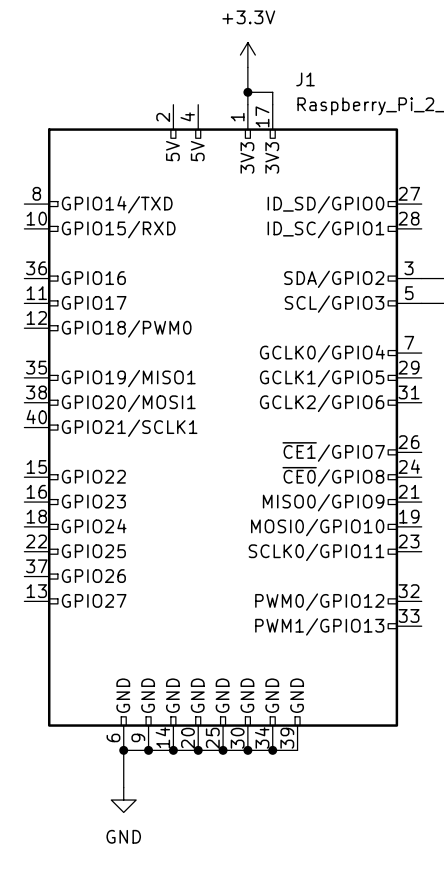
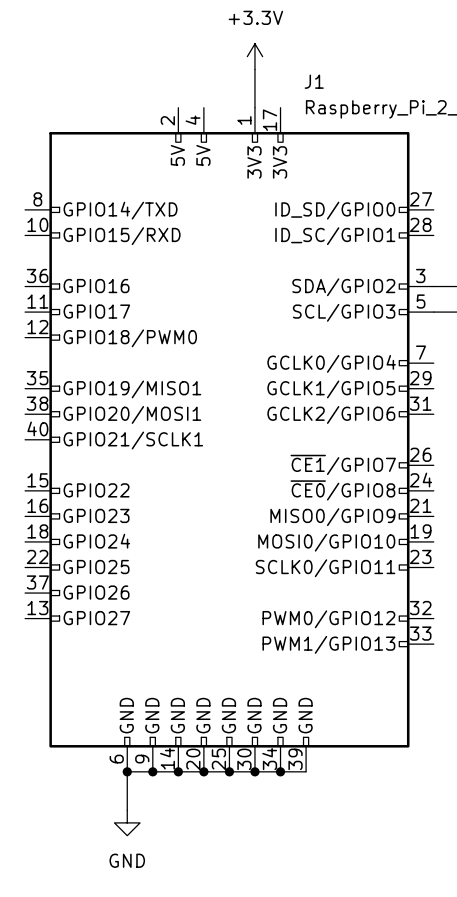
wire: (247, 92) (272, 92) (272, 104) -> none
junction: (247, 92) -> none

